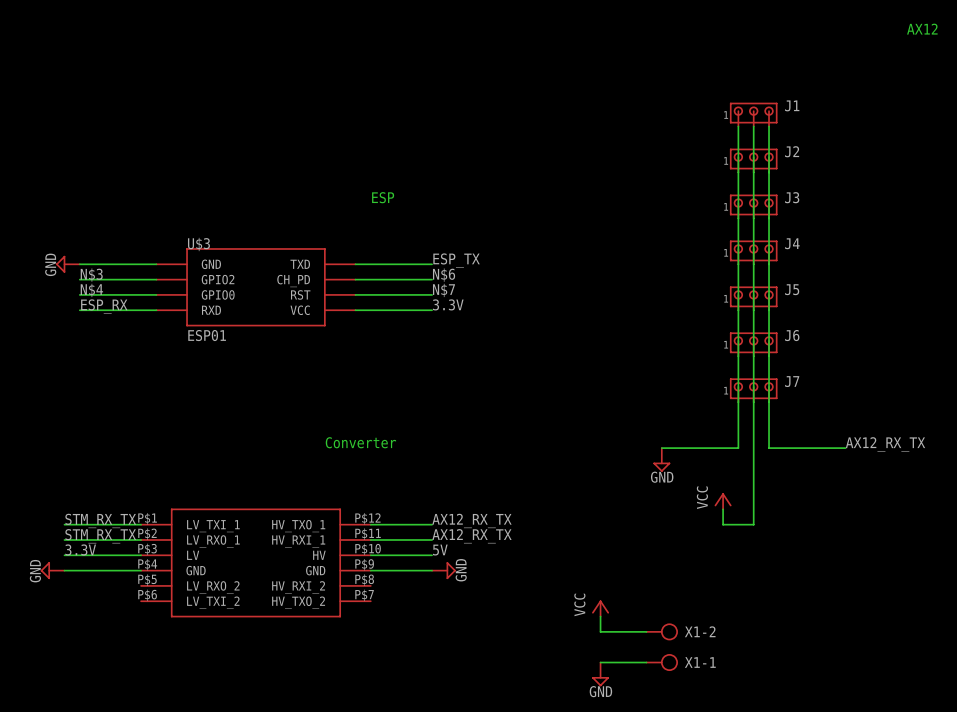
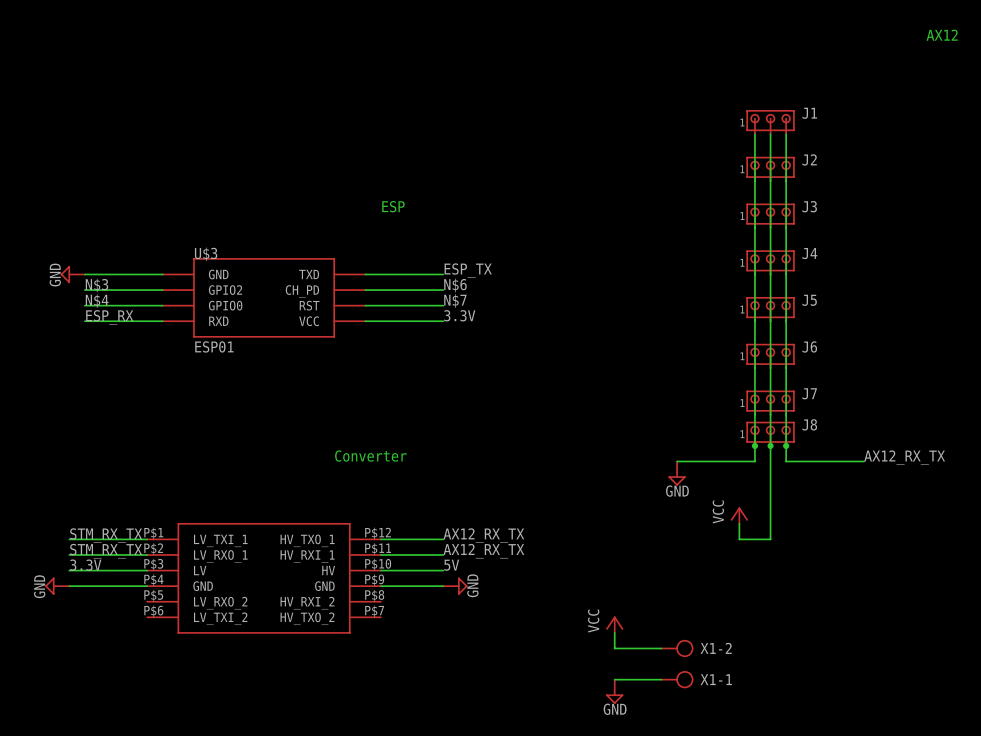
J8: none -> (770, 433)
junction: none -> (754, 445)
junction: none -> (770, 445)
junction: none -> (786, 445)

